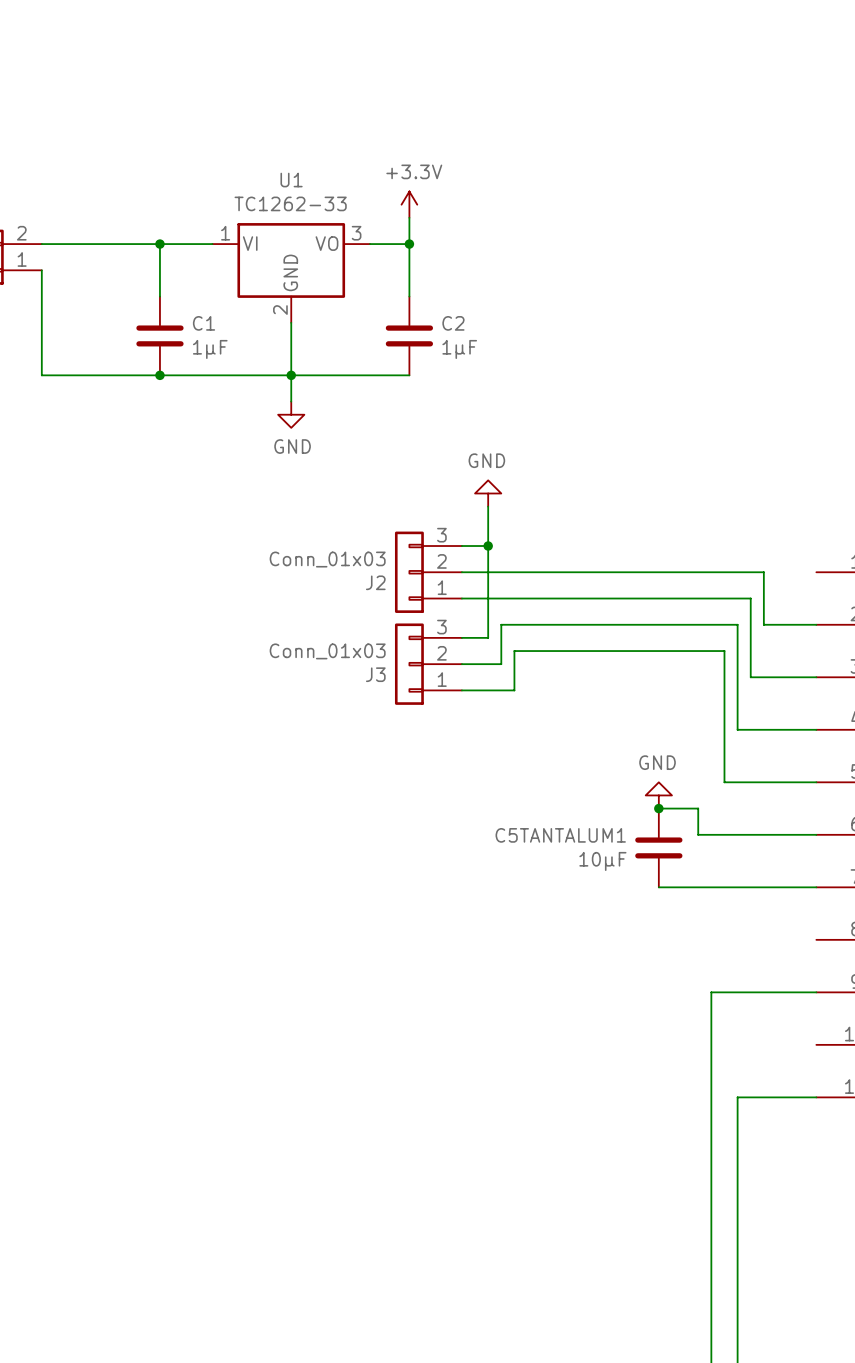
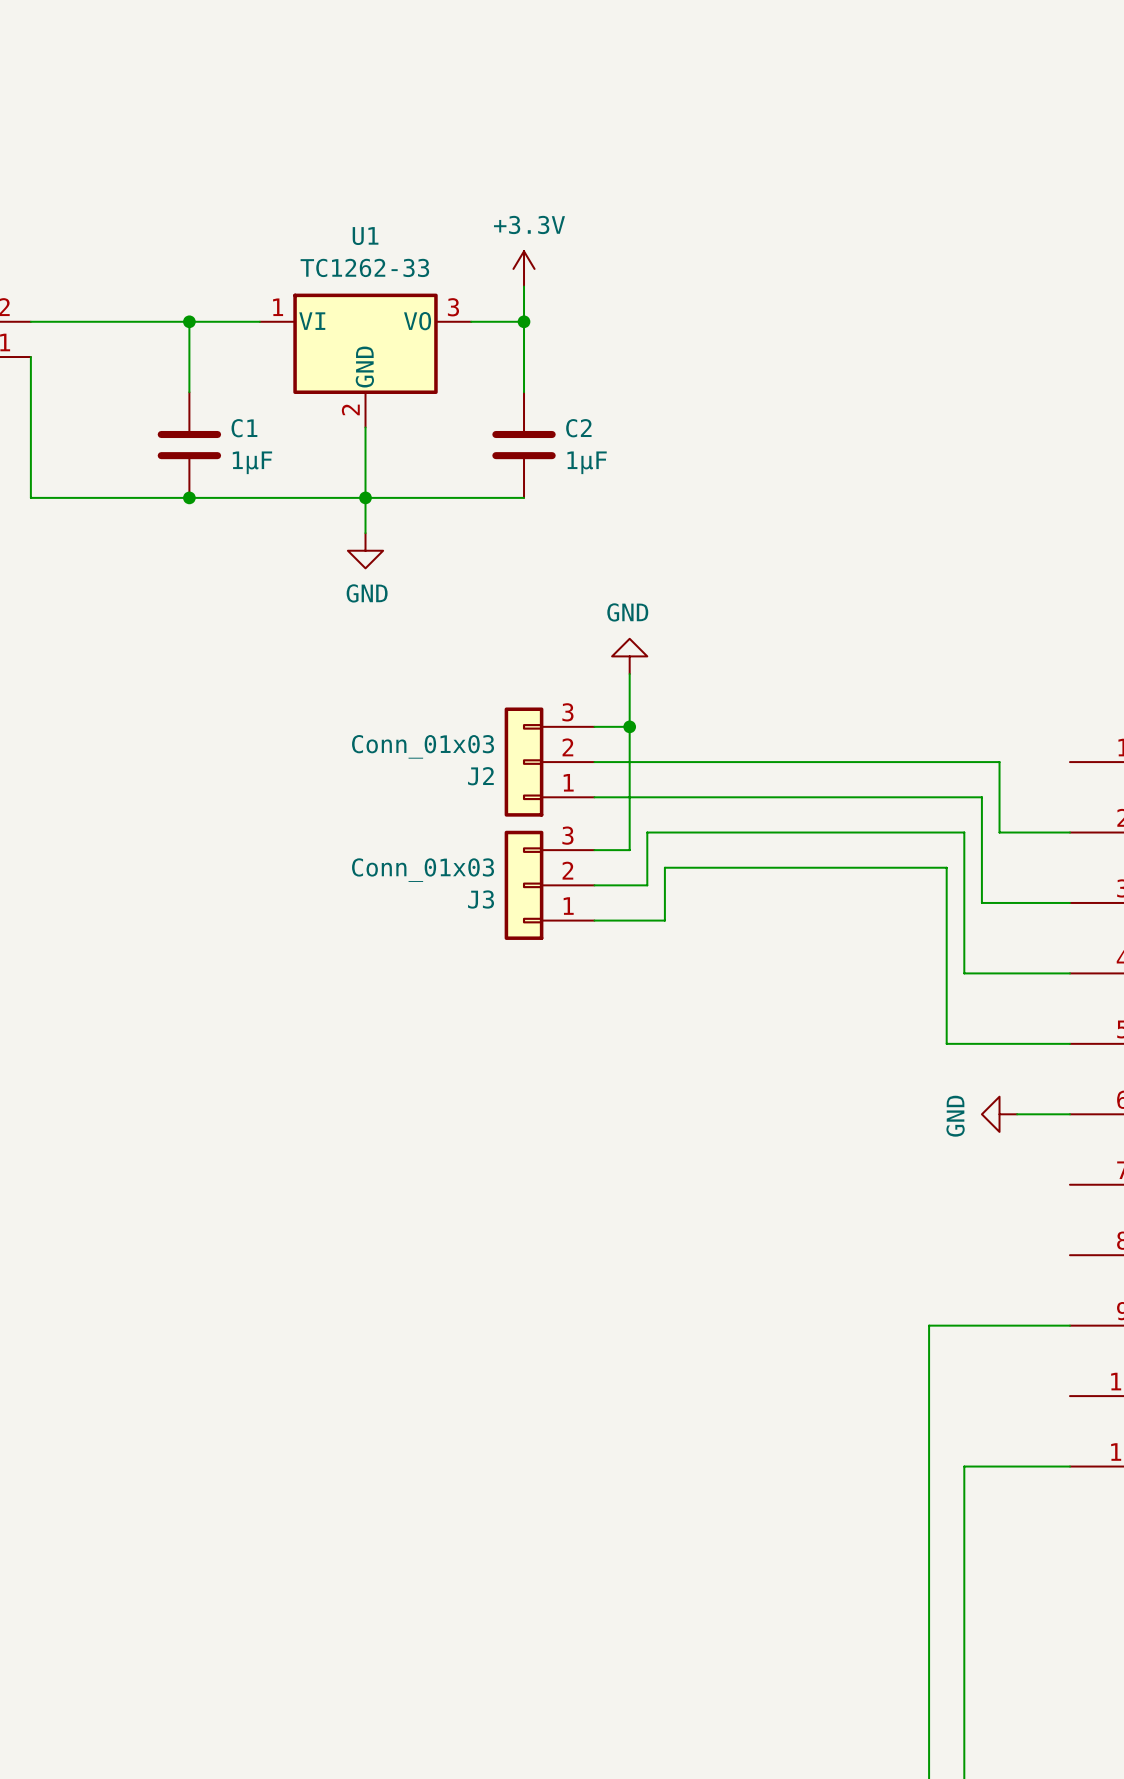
power symbol rotation: 0° (658, 795) -> 90° counterclockwise (999, 1114)
power symbol position: GND (658, 795) -> GND (999, 1114)
wire: (658, 808) (698, 808) (698, 834) (776, 834) -> none
junction: (658, 808) -> none
C5TANTALUM1: 10µF (658, 847) -> none
wire: (658, 887) (816, 887) -> none

